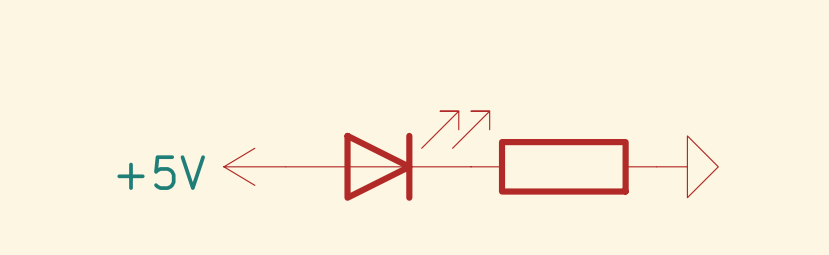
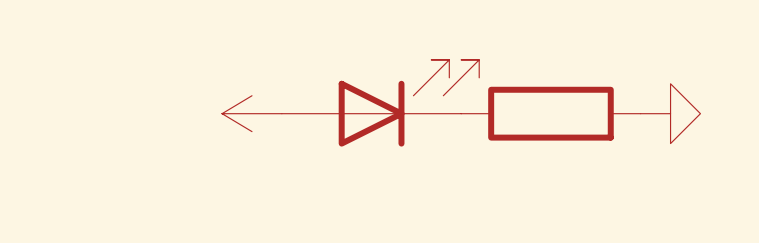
power symbol text: +5V (161, 172) -> none

